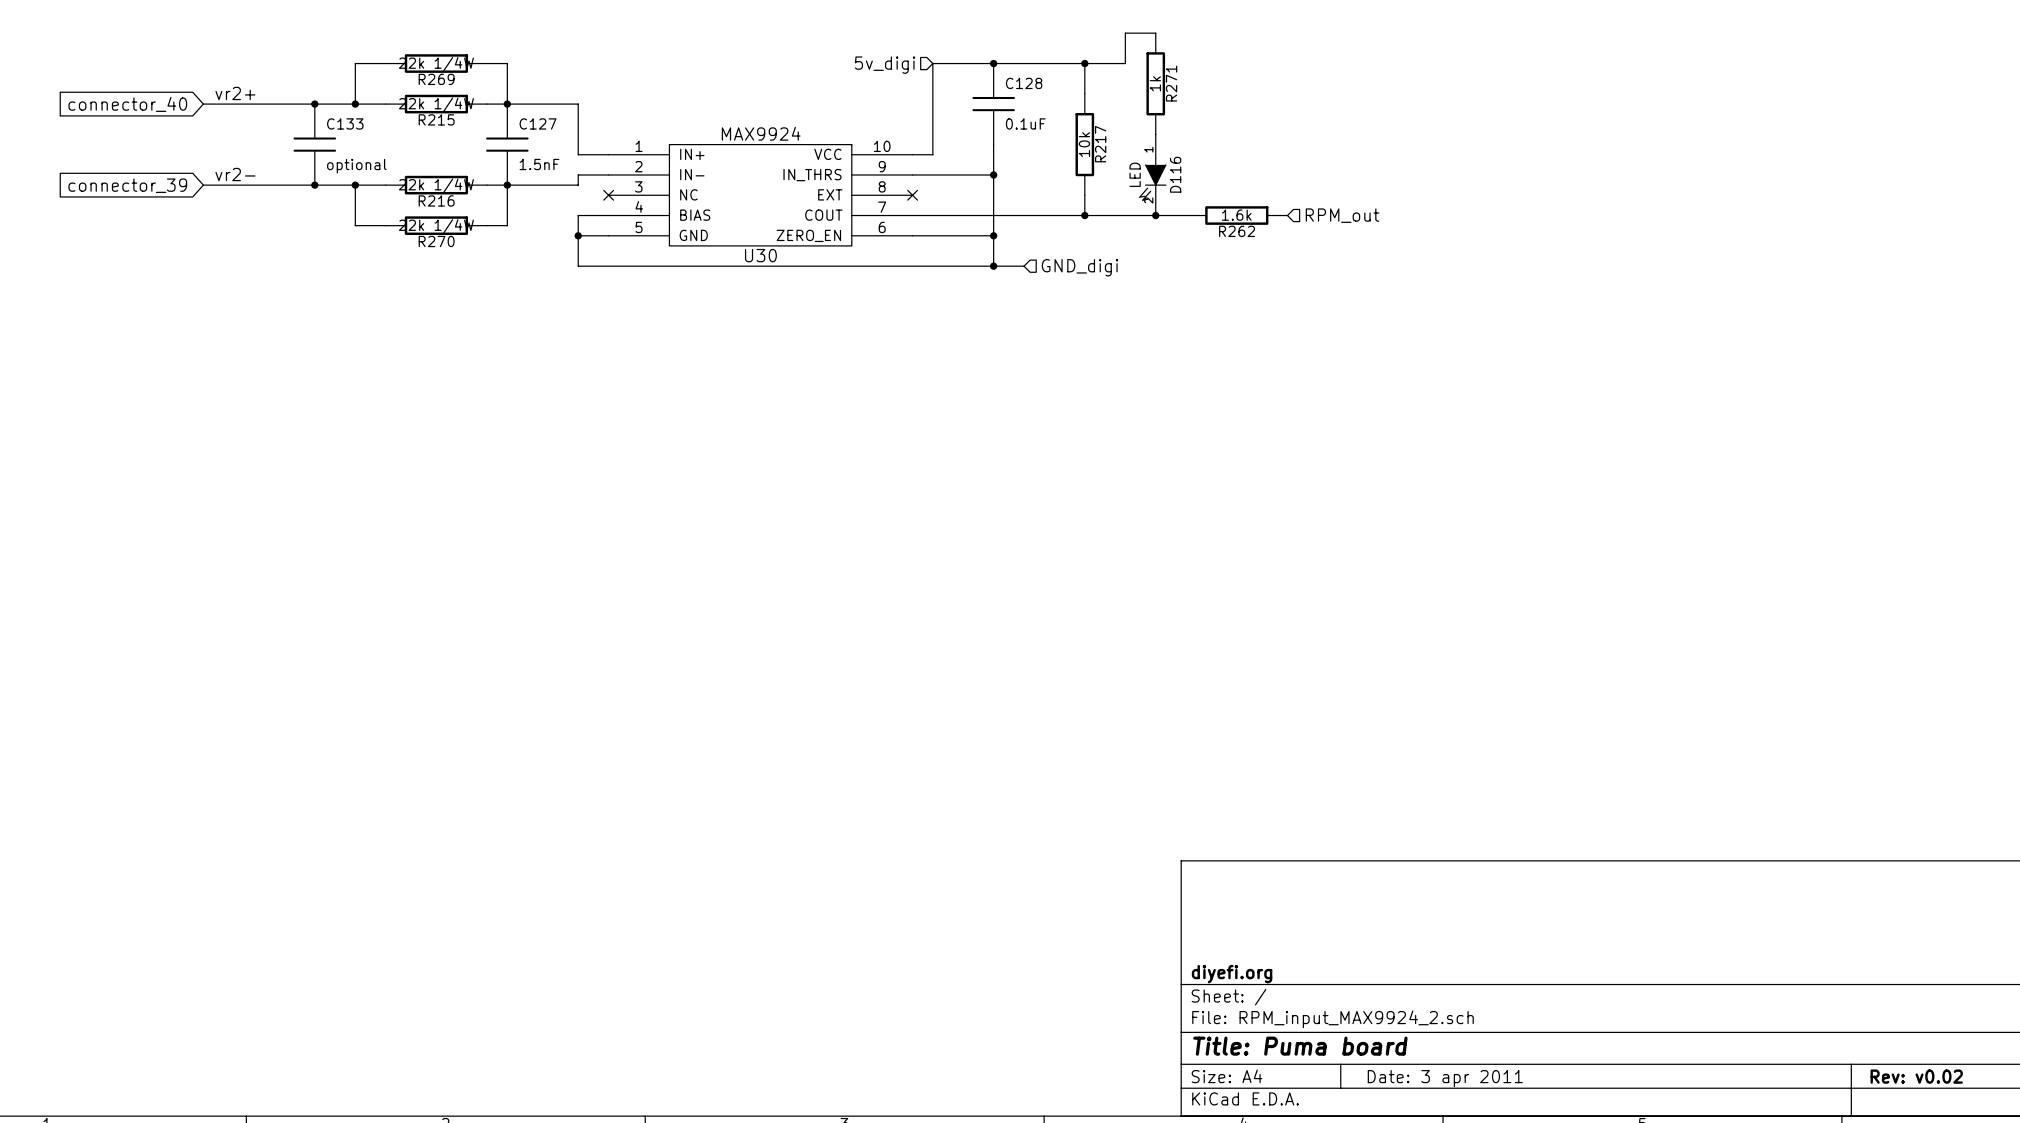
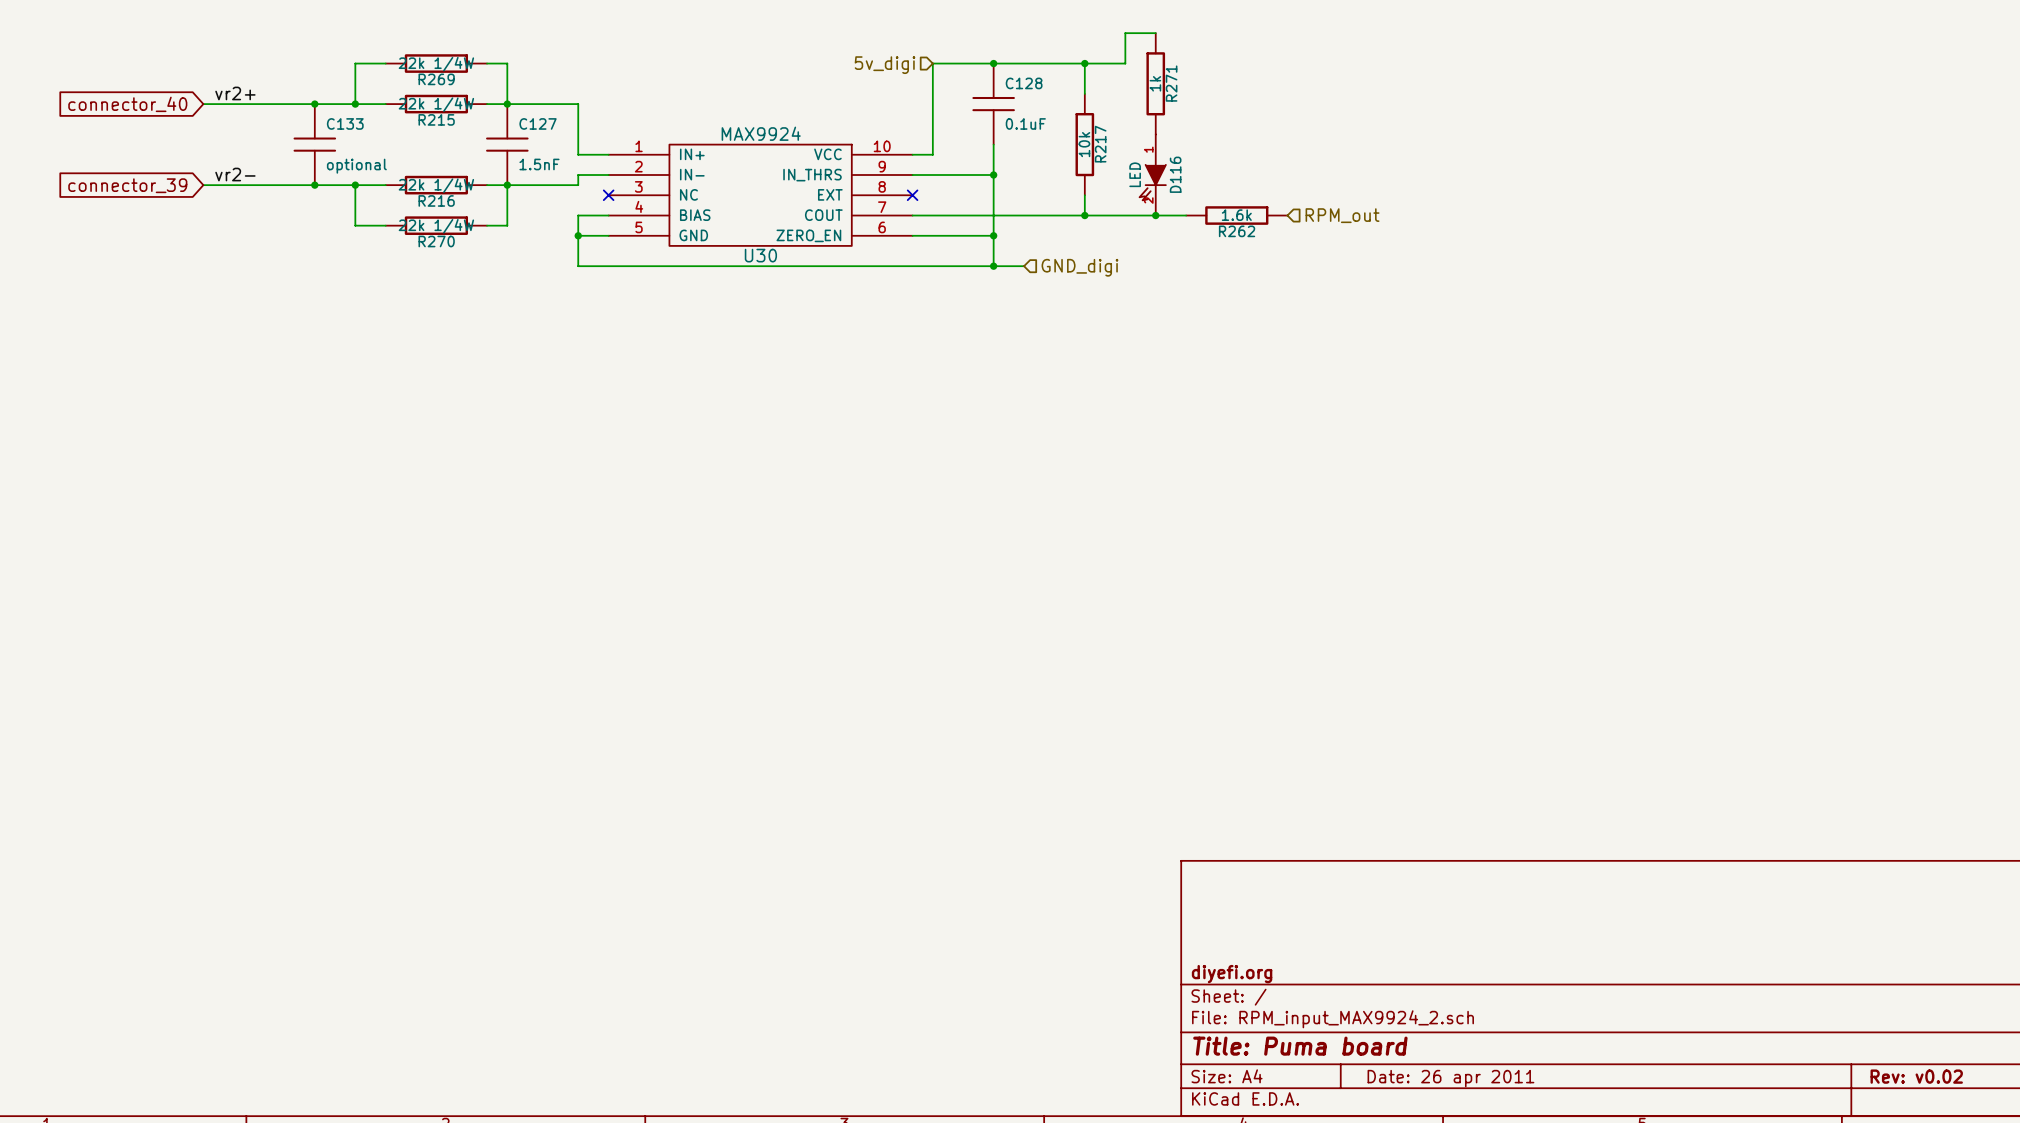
title block: Date: 3 apr 2011 (1445, 1078) -> Date: 26 apr 2011 (1450, 1078)

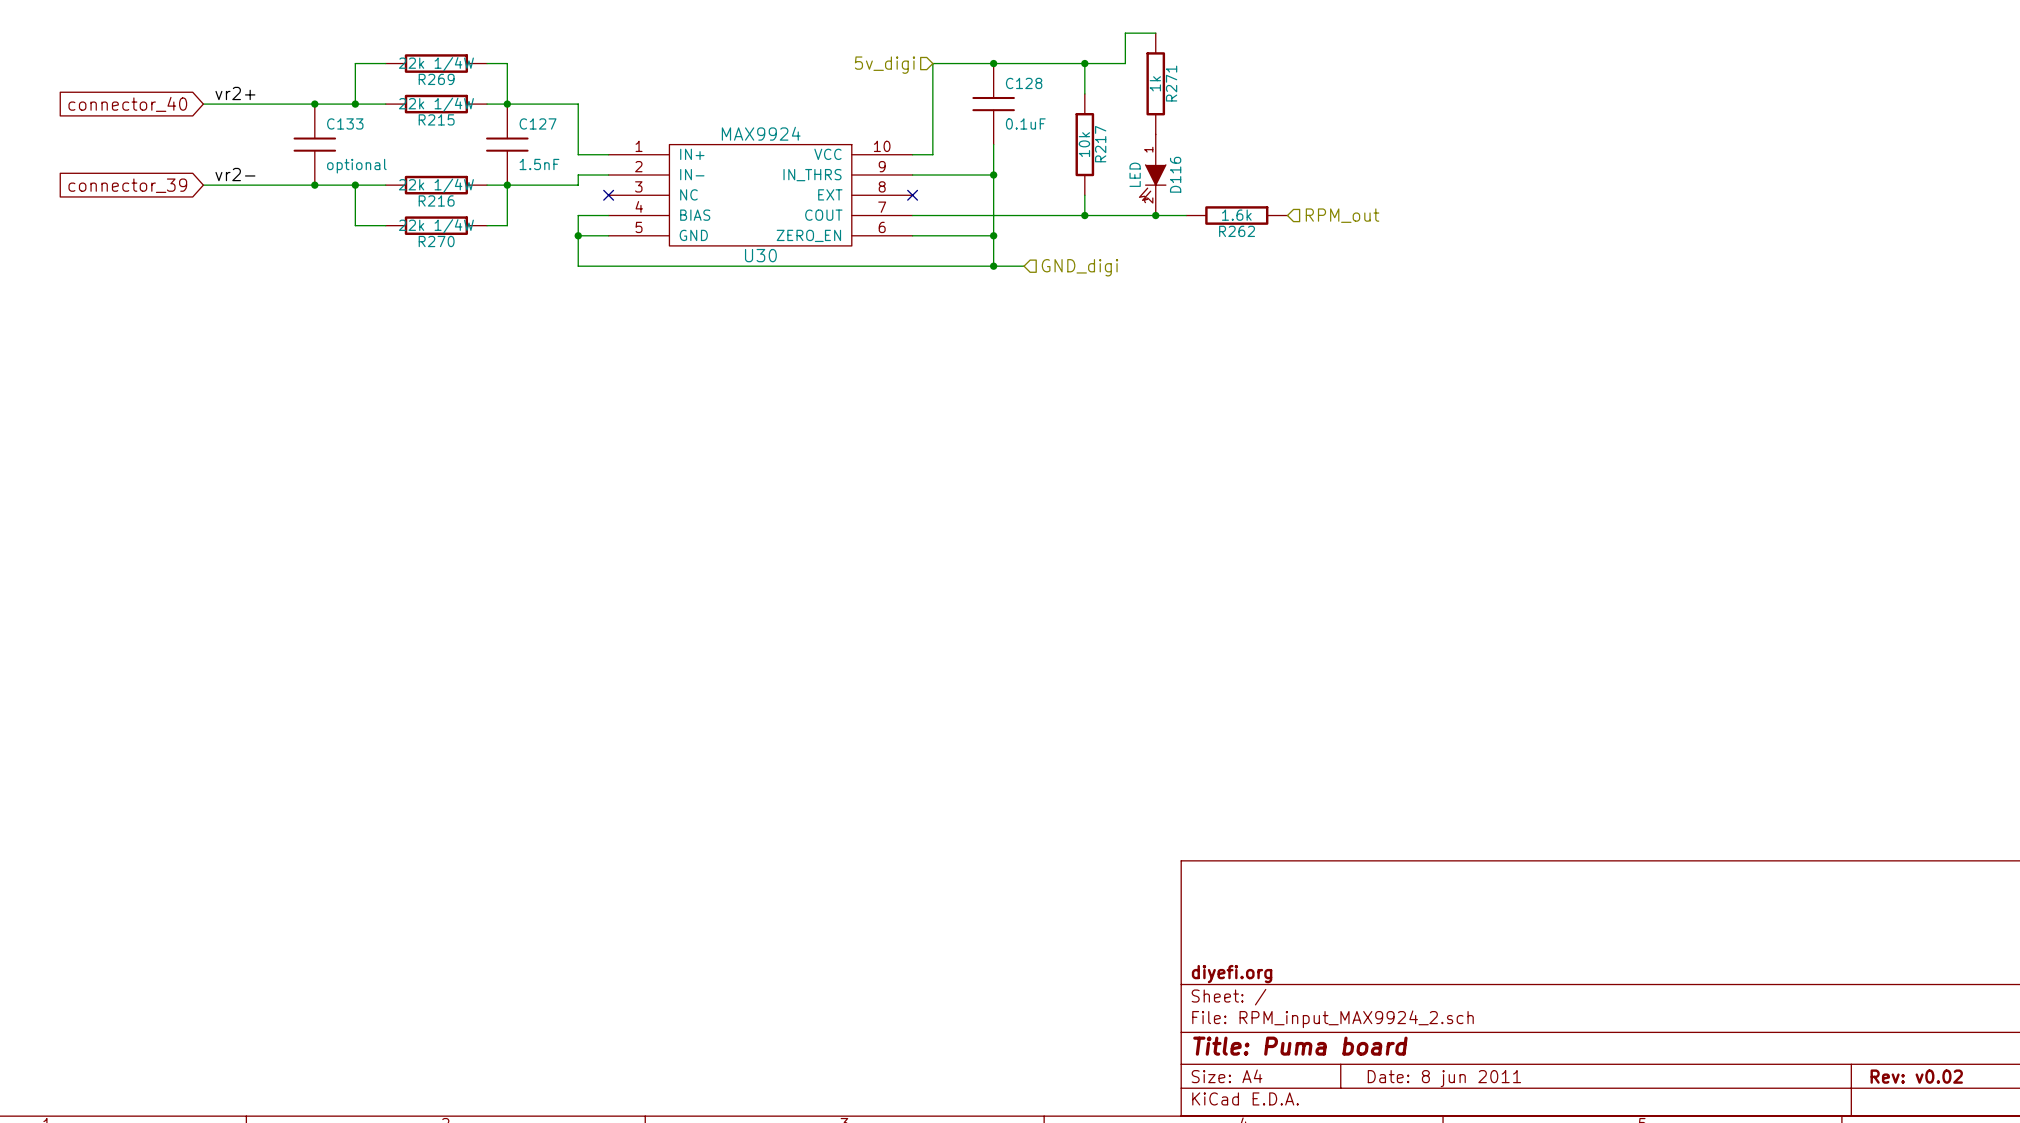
title block: Date: 26 apr 2011 (1450, 1078) -> Date: 8 jun 2011 (1444, 1078)

